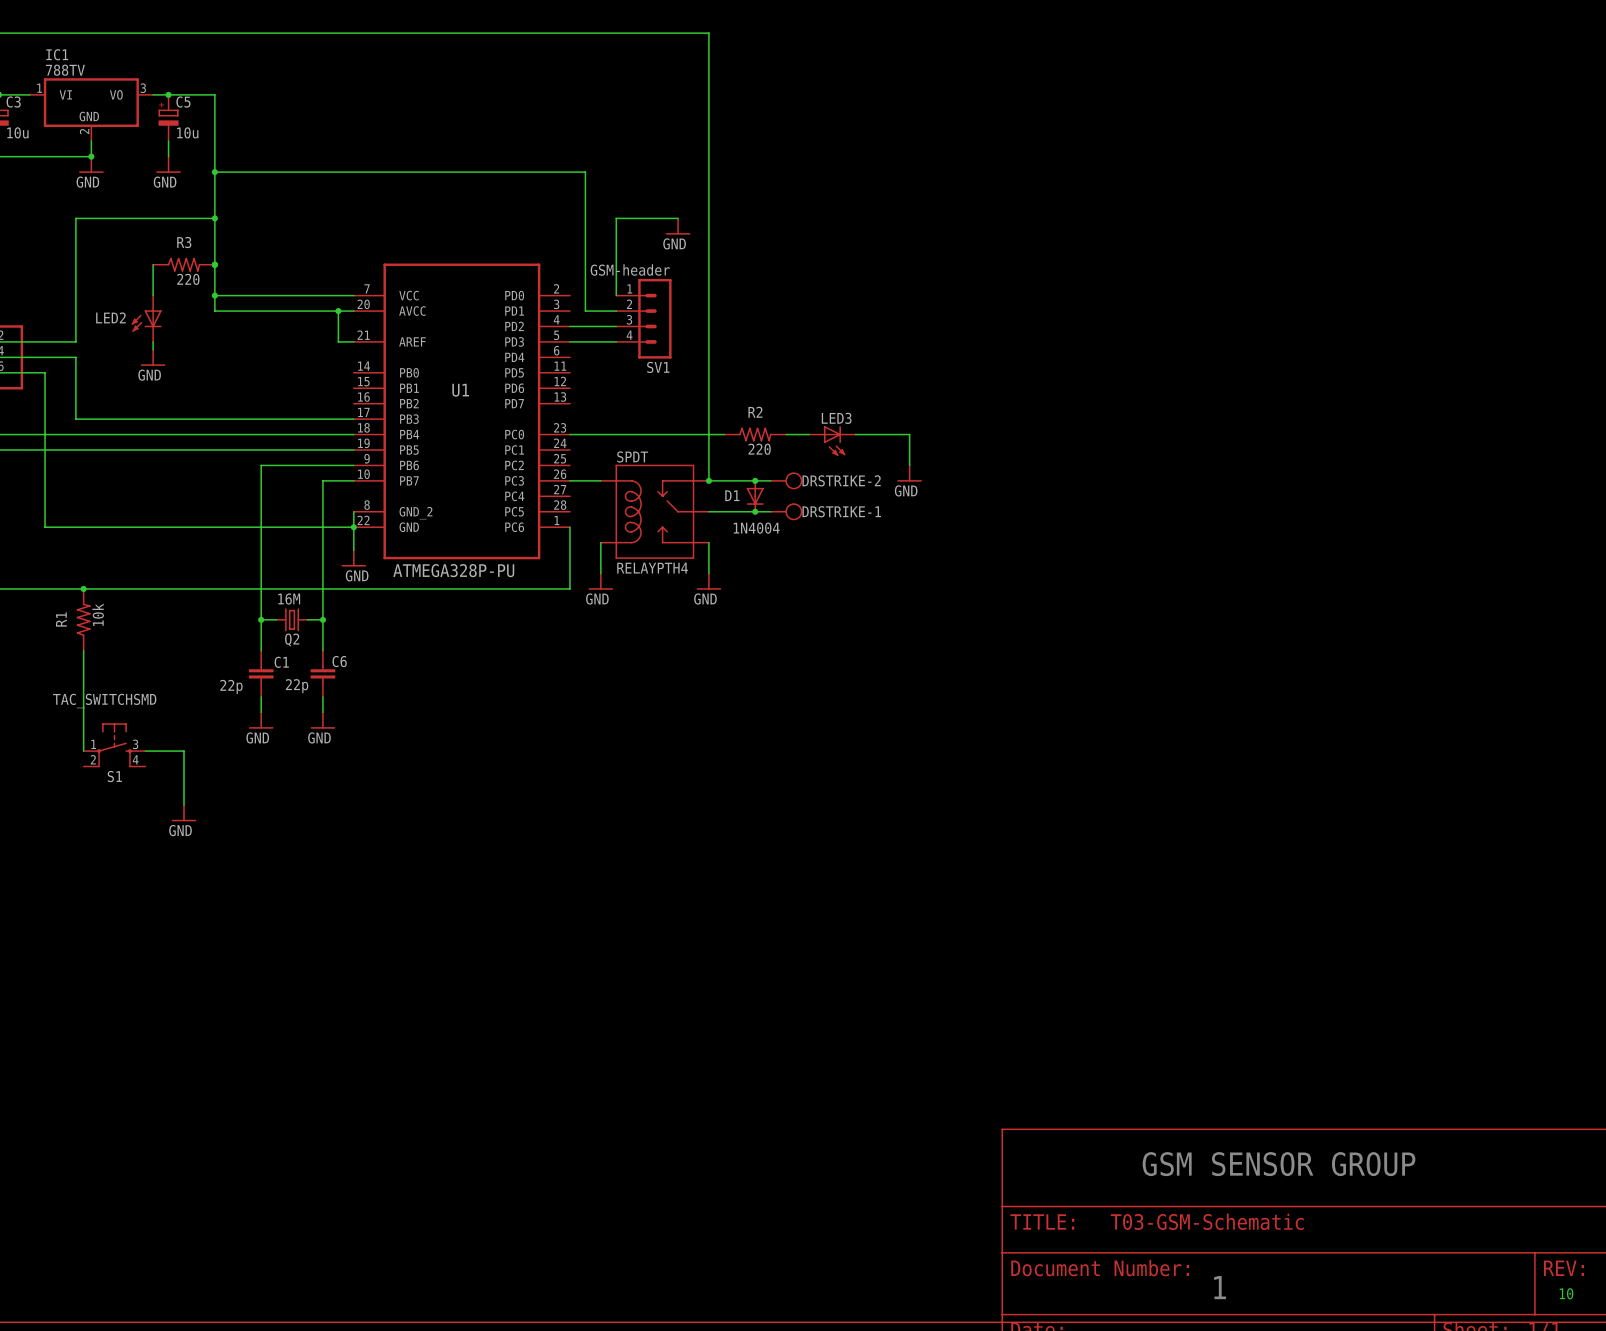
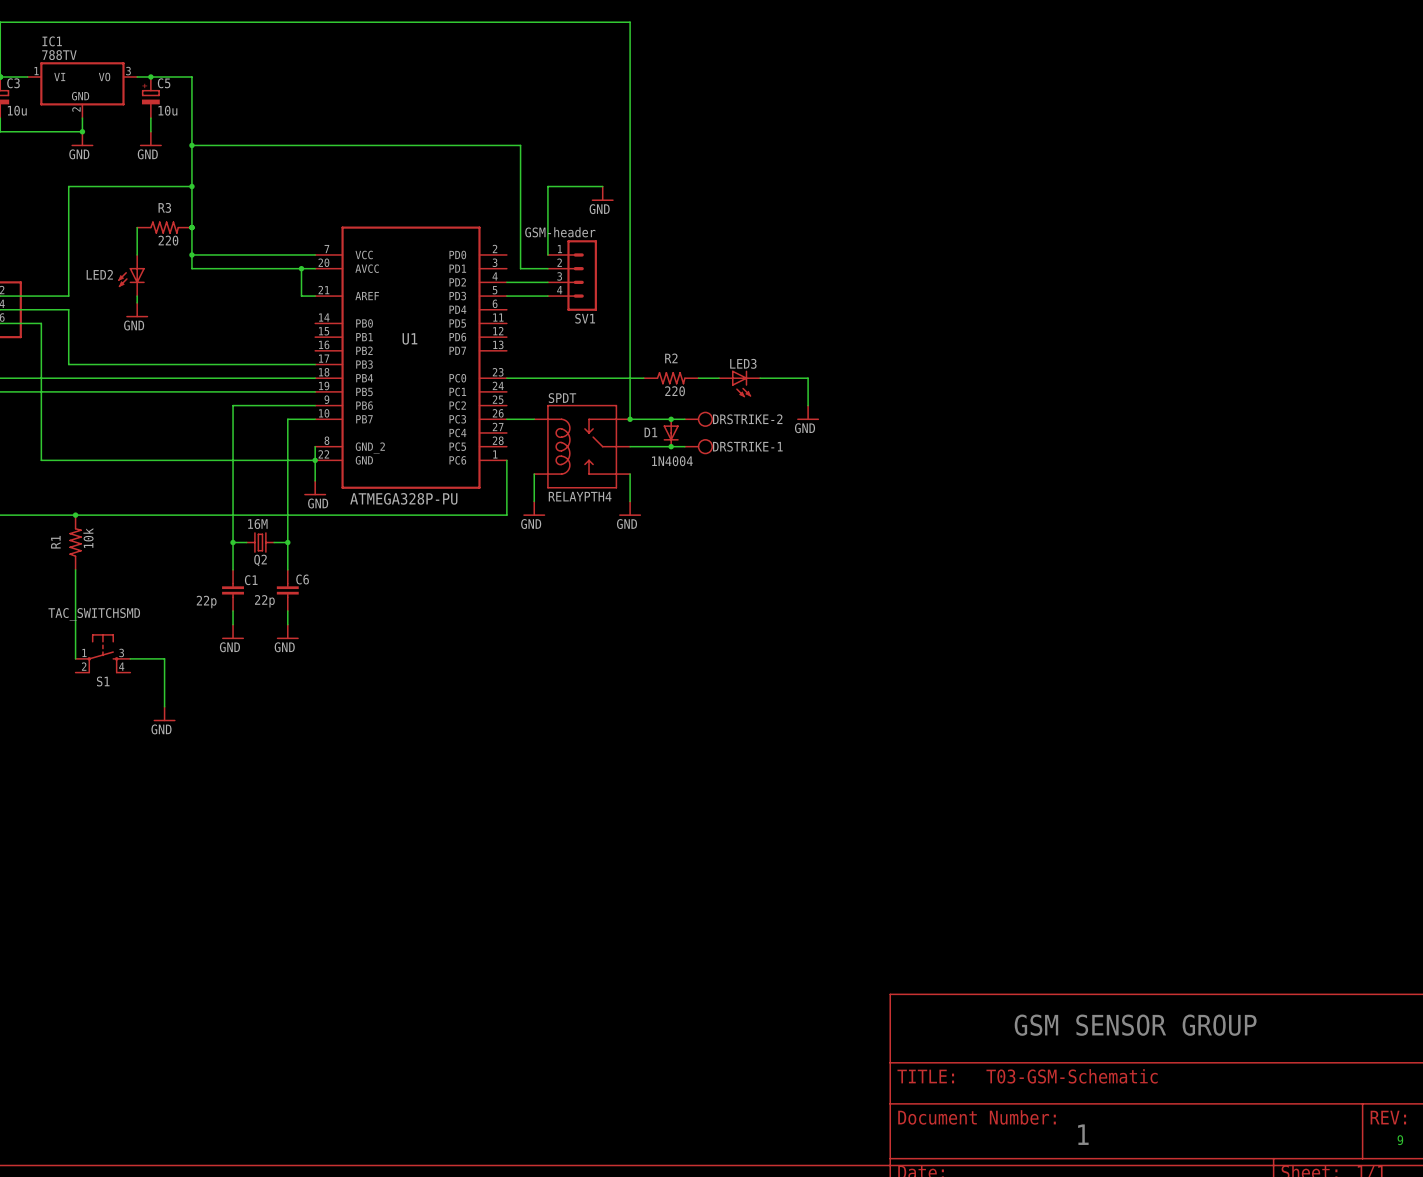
text: 10 (1566, 1293) -> none
text: none -> 9 (1400, 1140)

